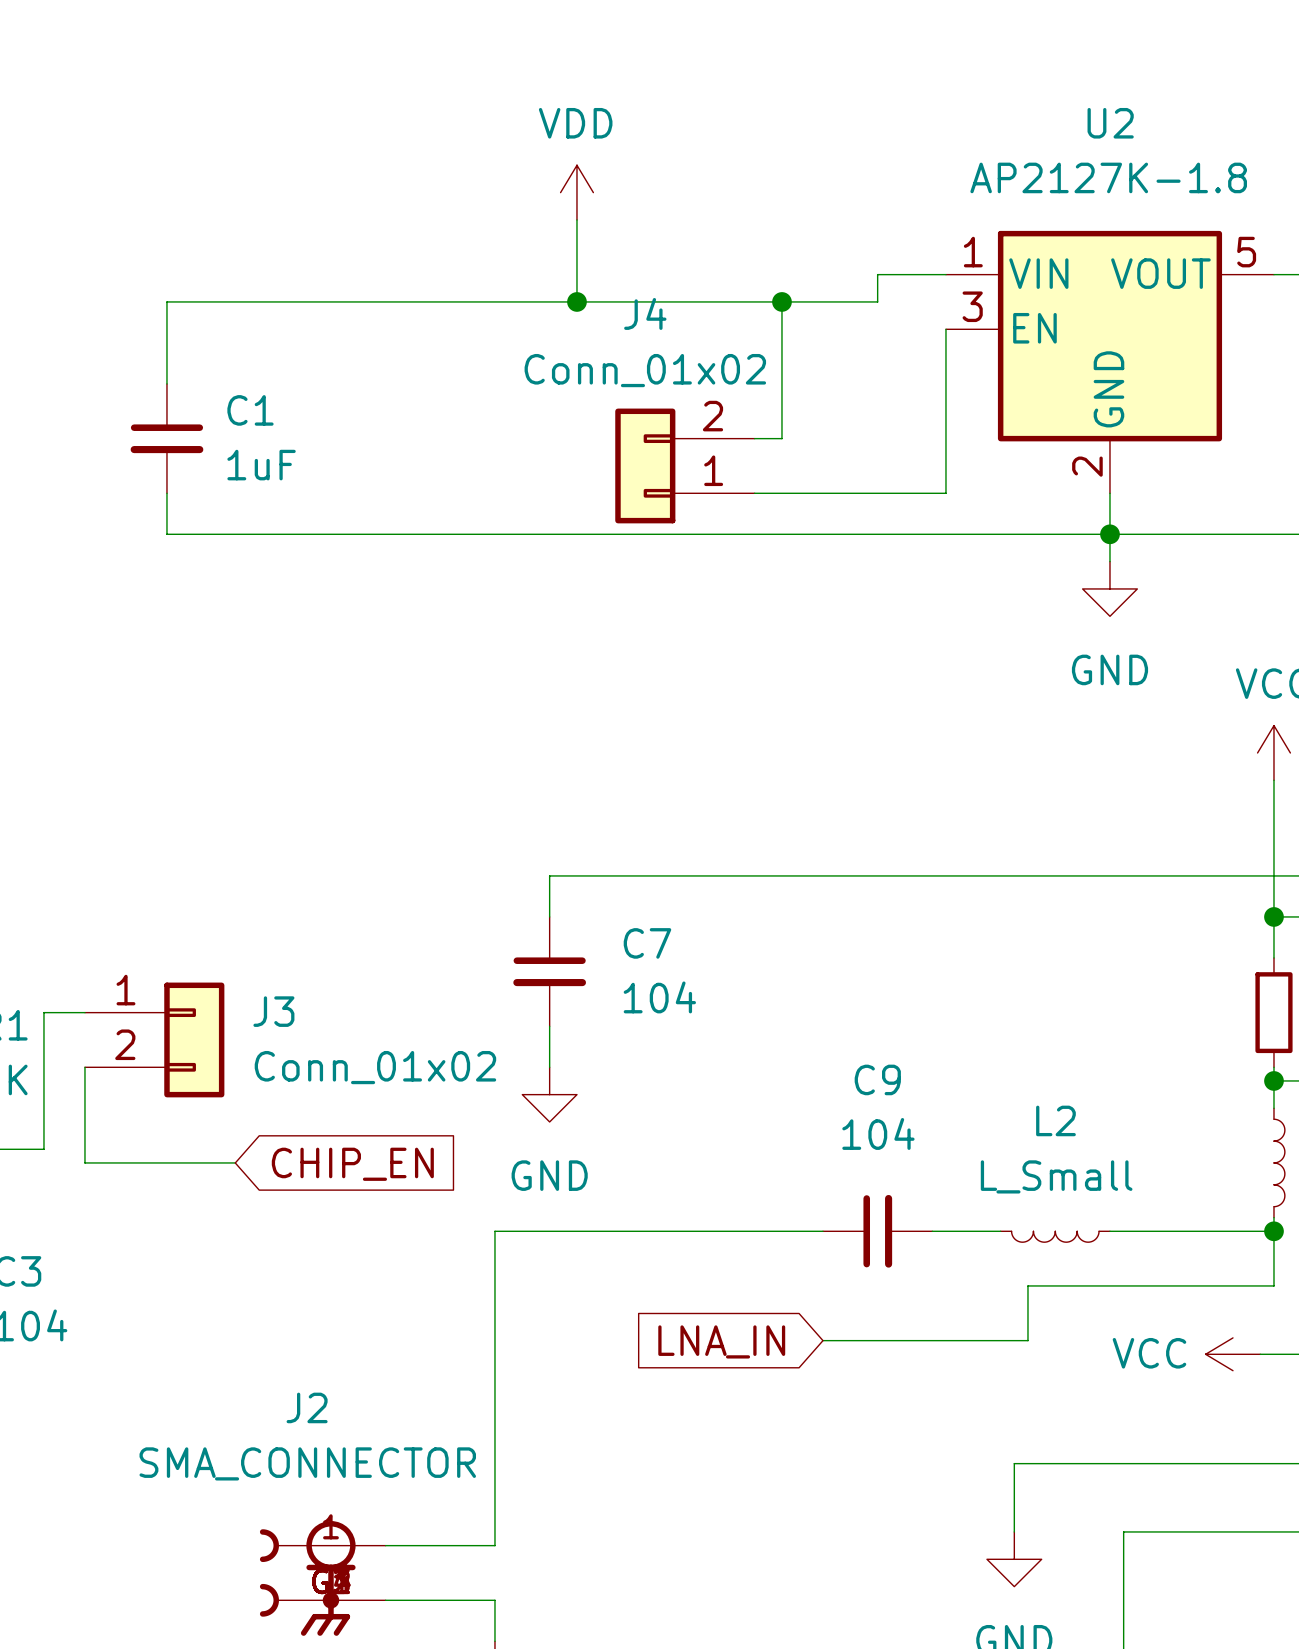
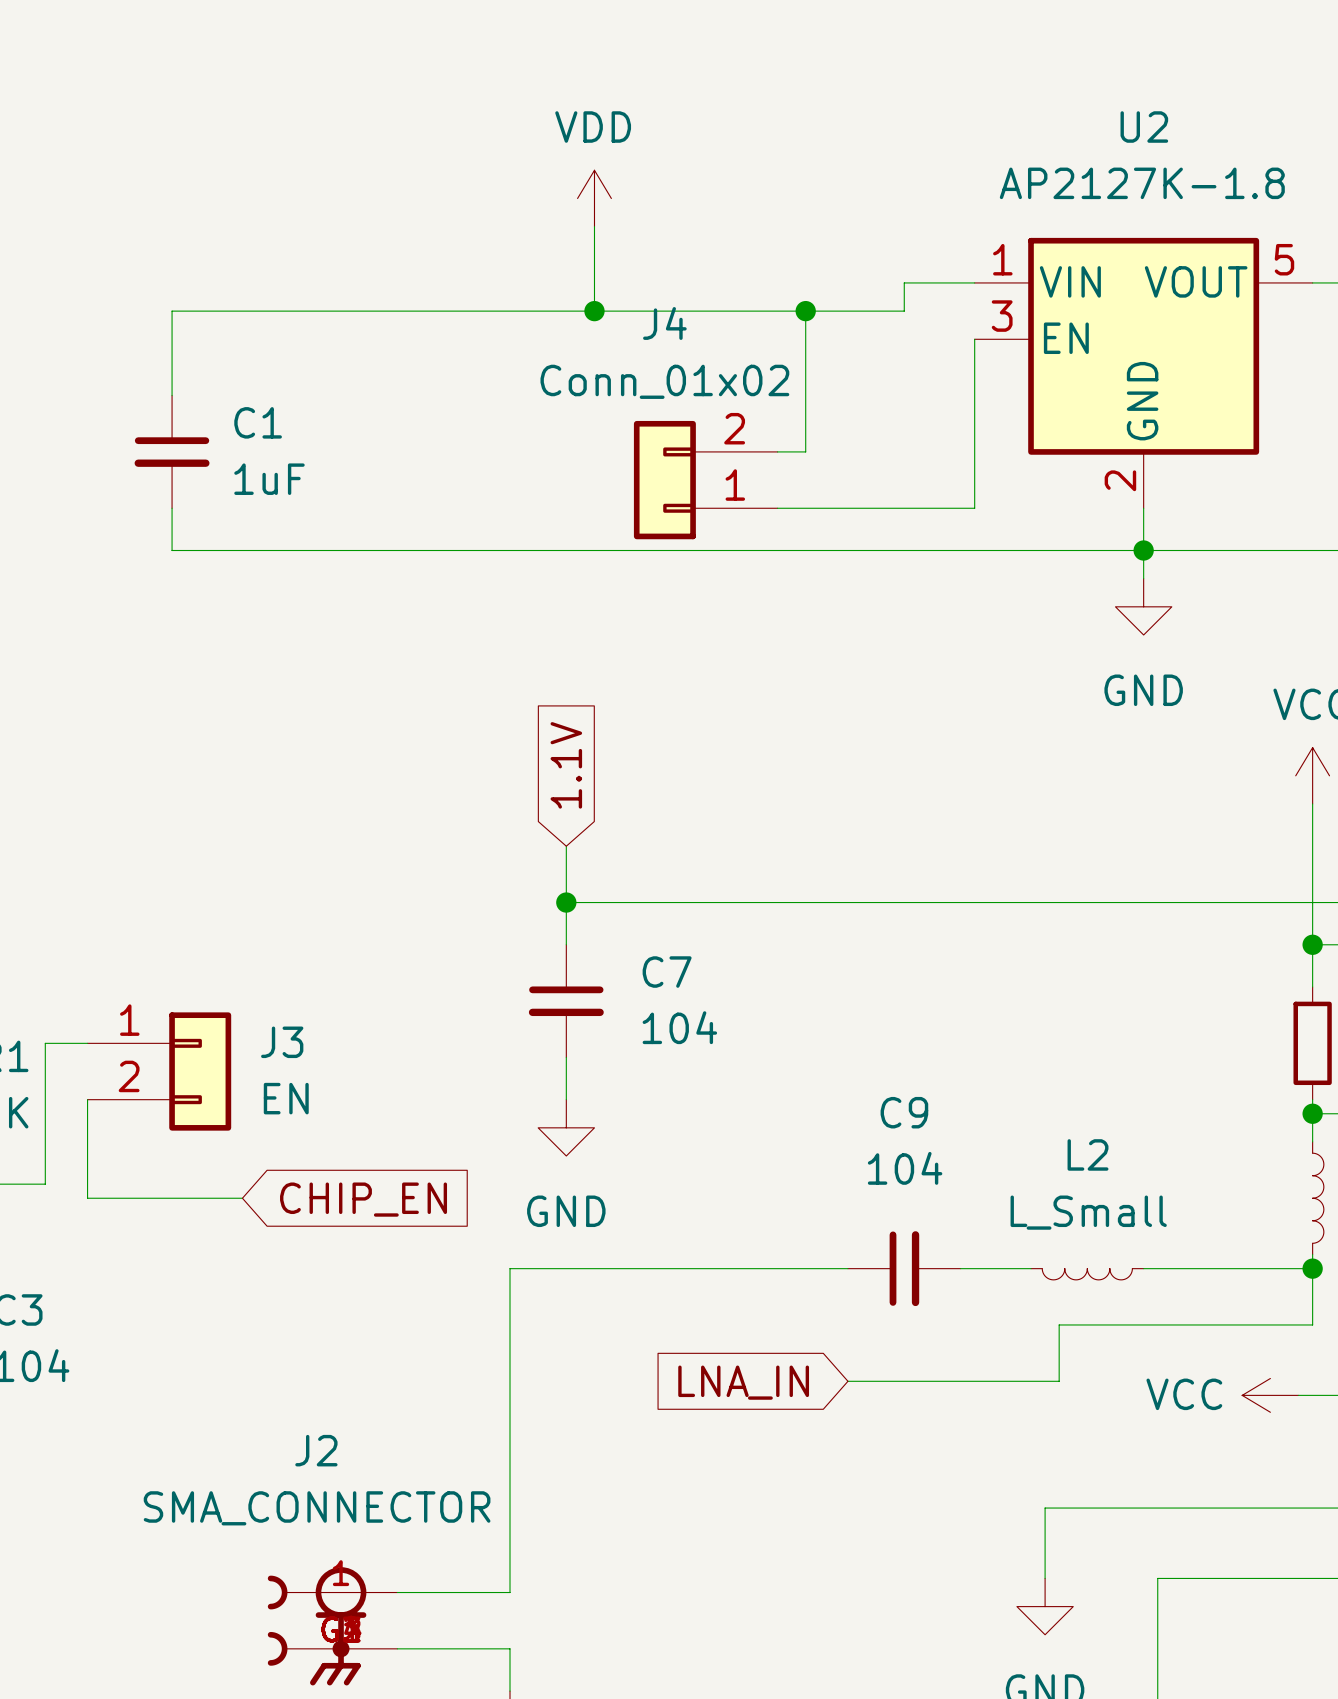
global label: none -> 1.1V (566, 765)
wire: none -> (566, 846) (566, 902)
junction: none -> (566, 902)
J3 value: Conn_01x02 (375, 1067) -> EN (286, 1098)

